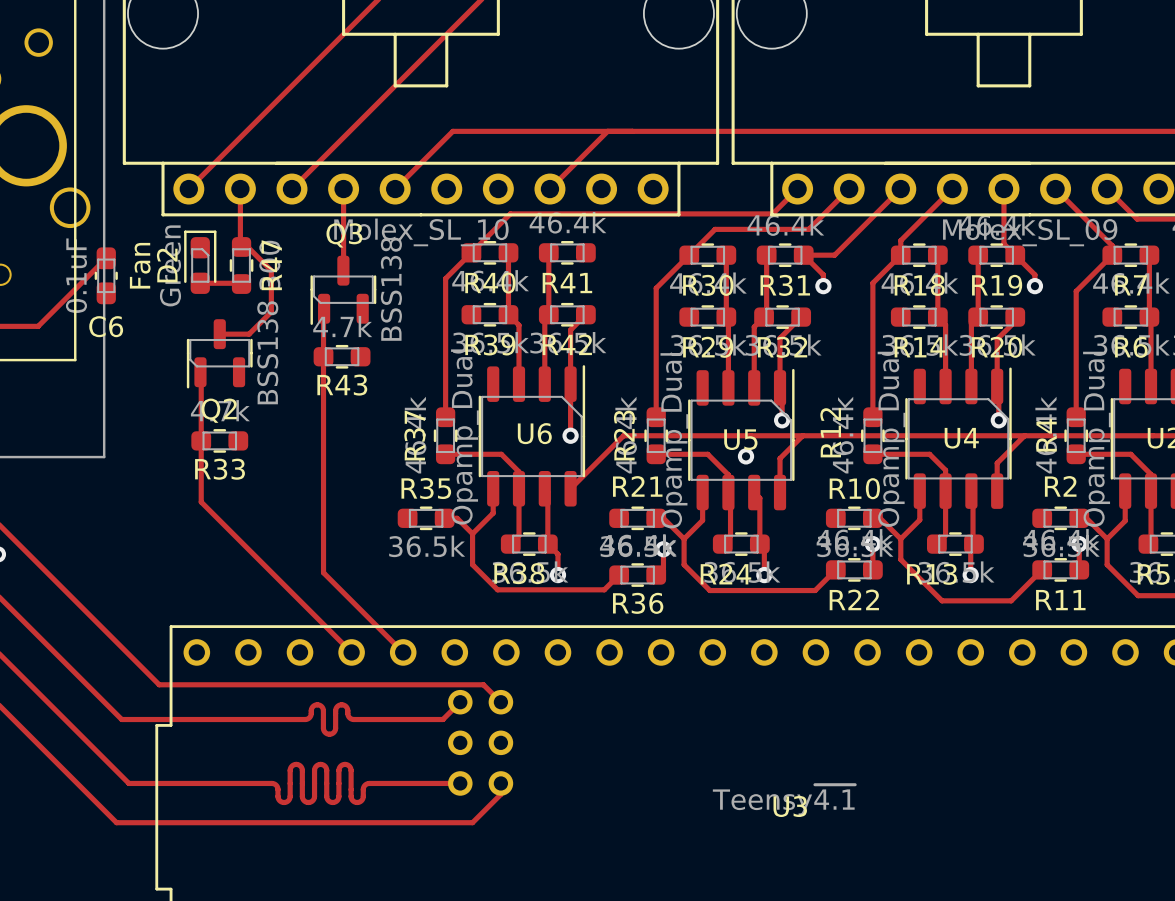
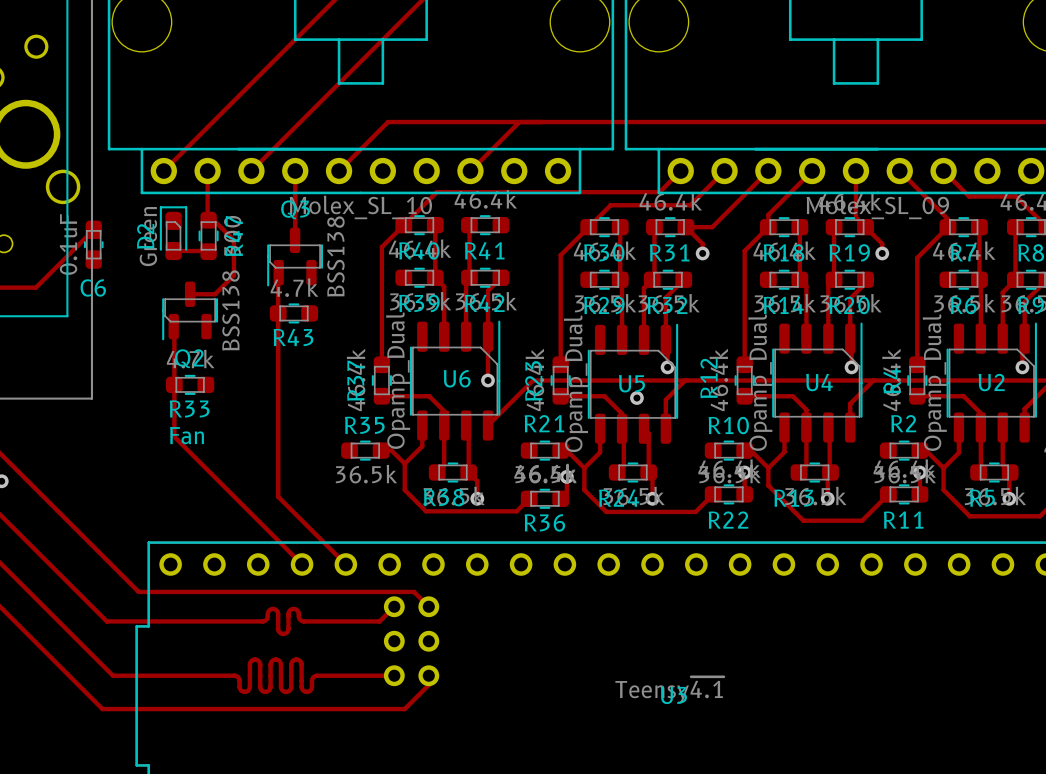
text rotation: 0° (140, 265) -> 90° clockwise (186, 435)
text position: Fan (140, 265) -> Fan (186, 435)

